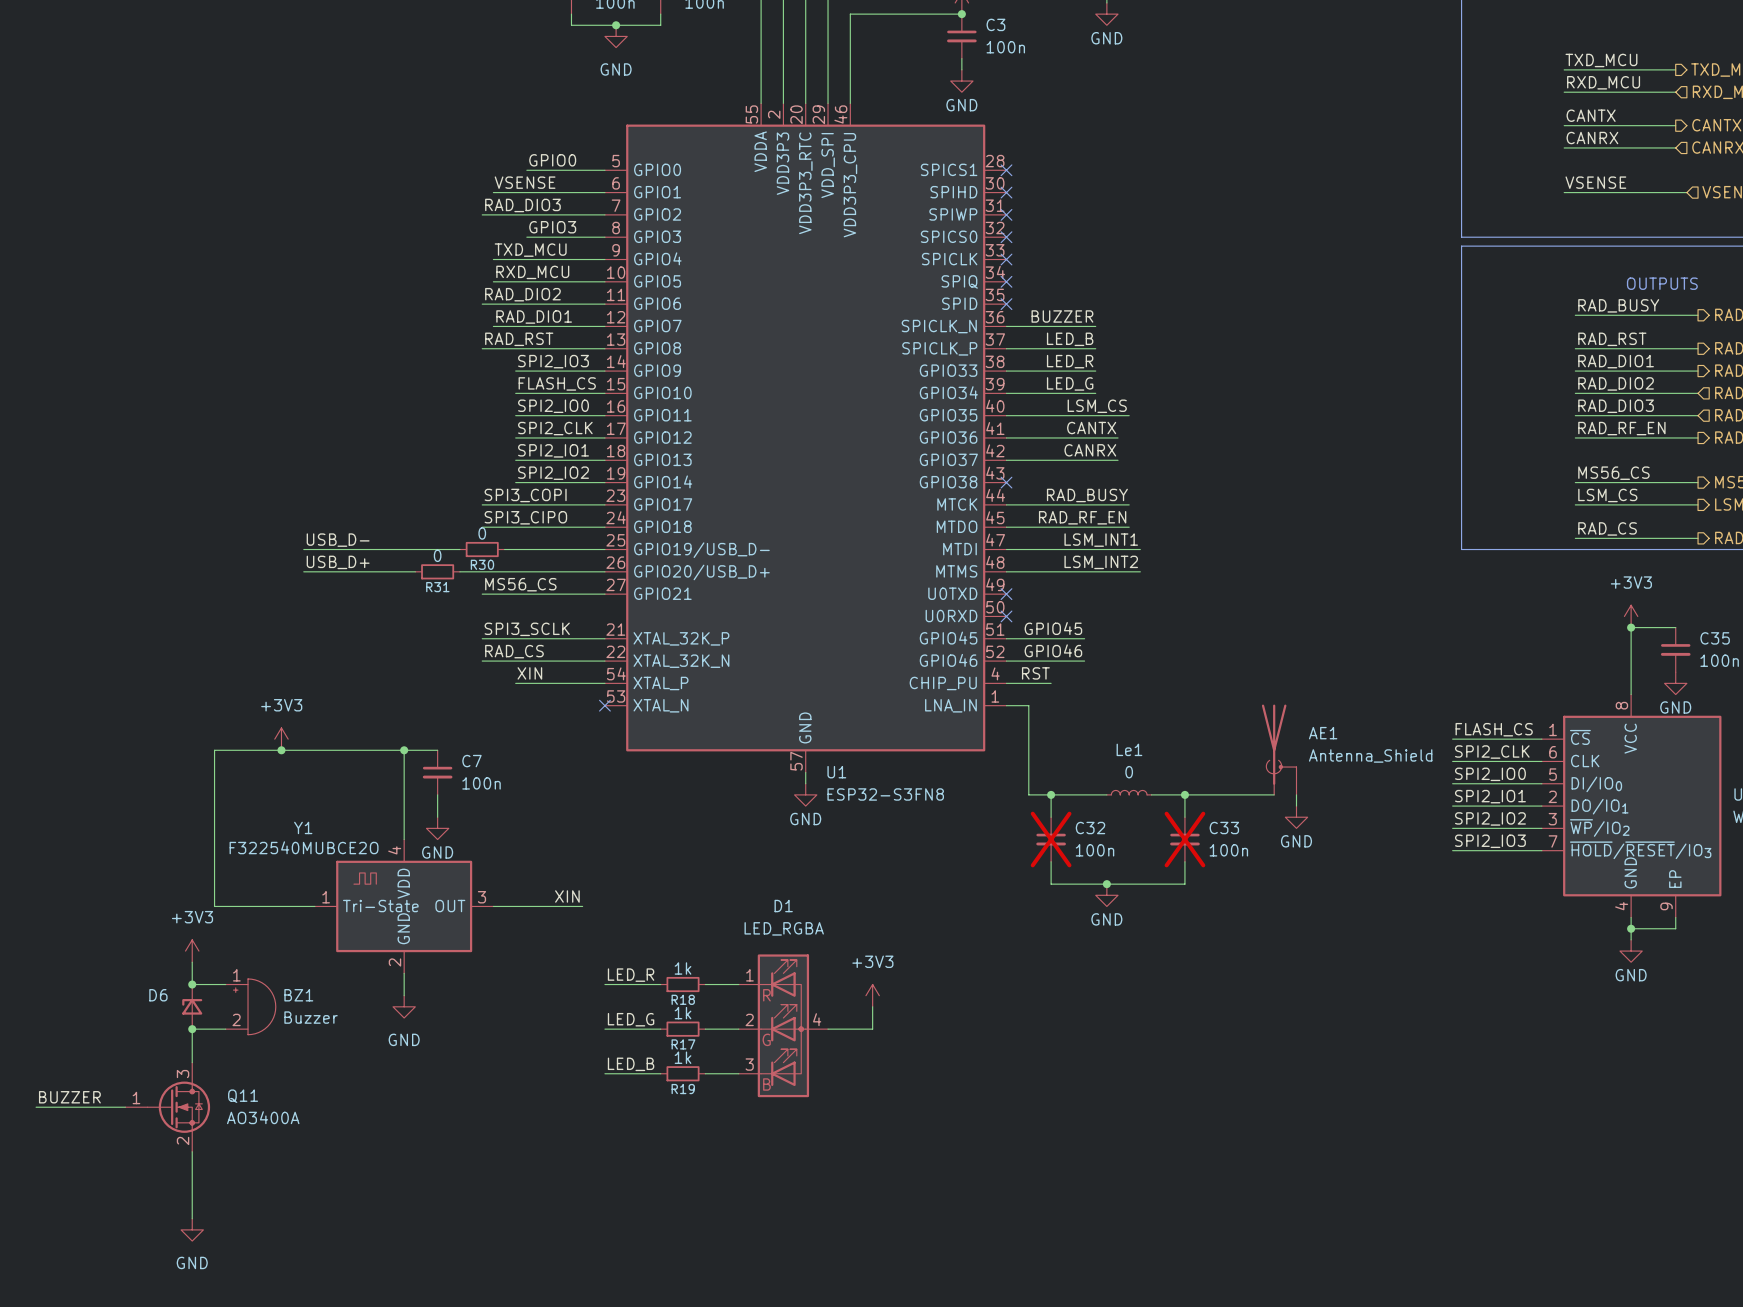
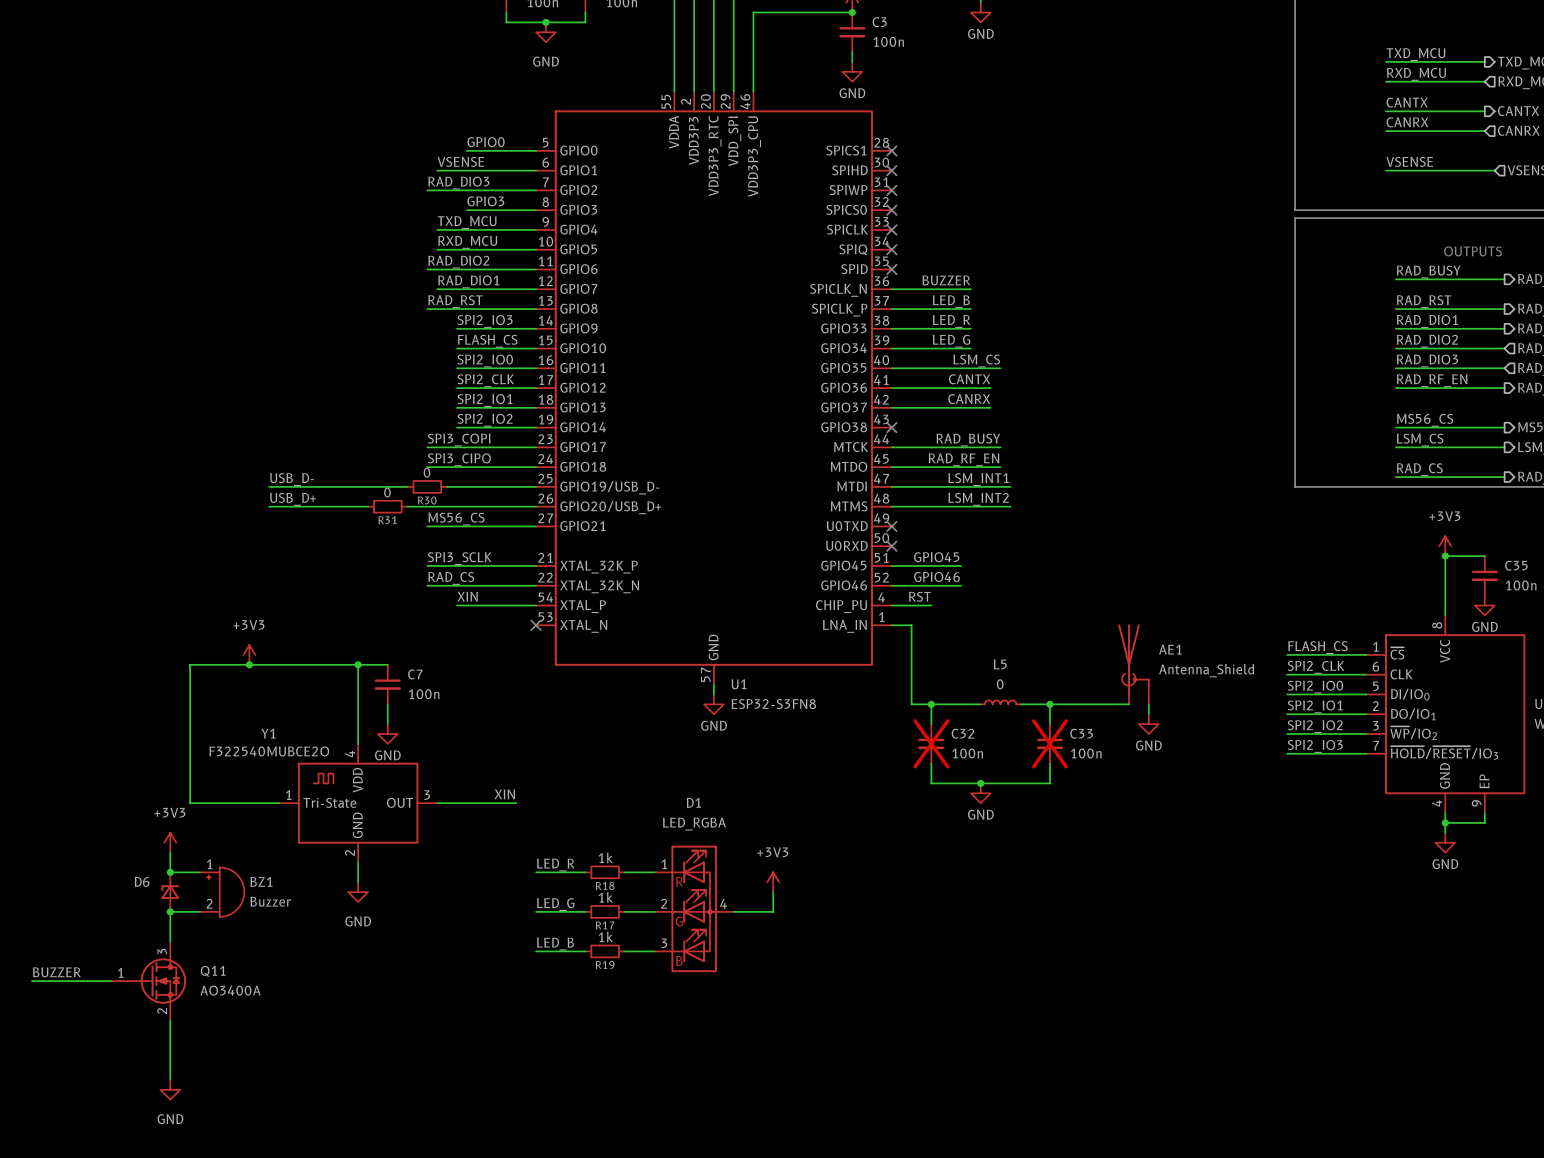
Le1 name: Le1 (1129, 749) -> L5 (1000, 664)

